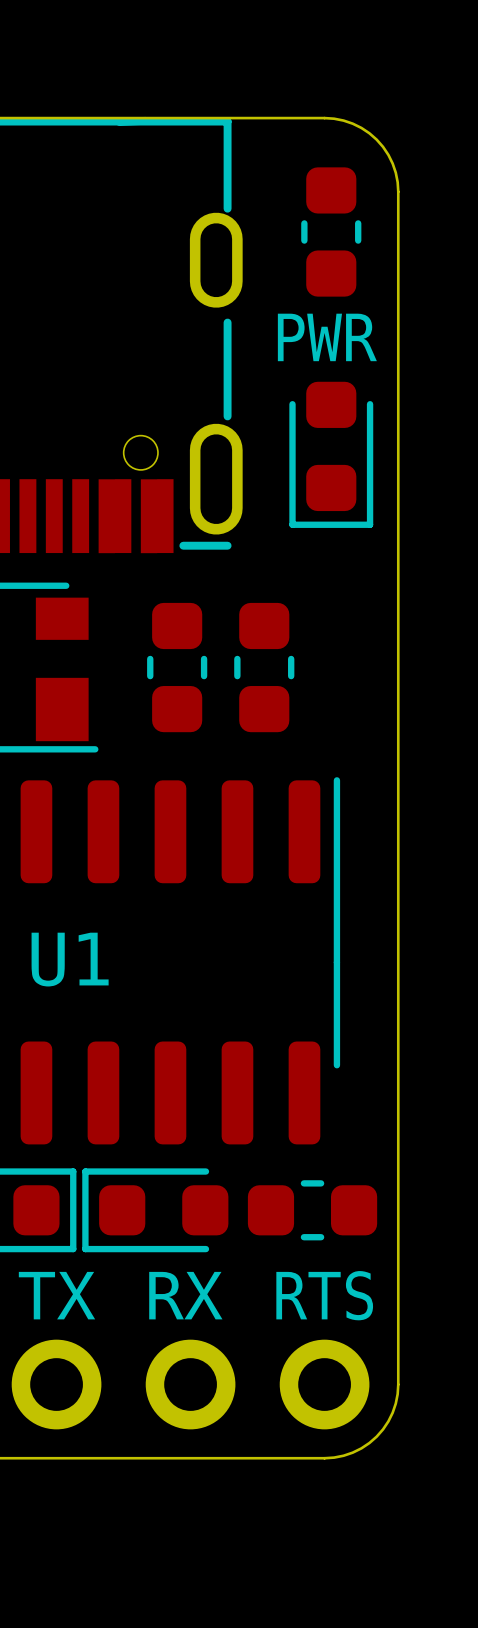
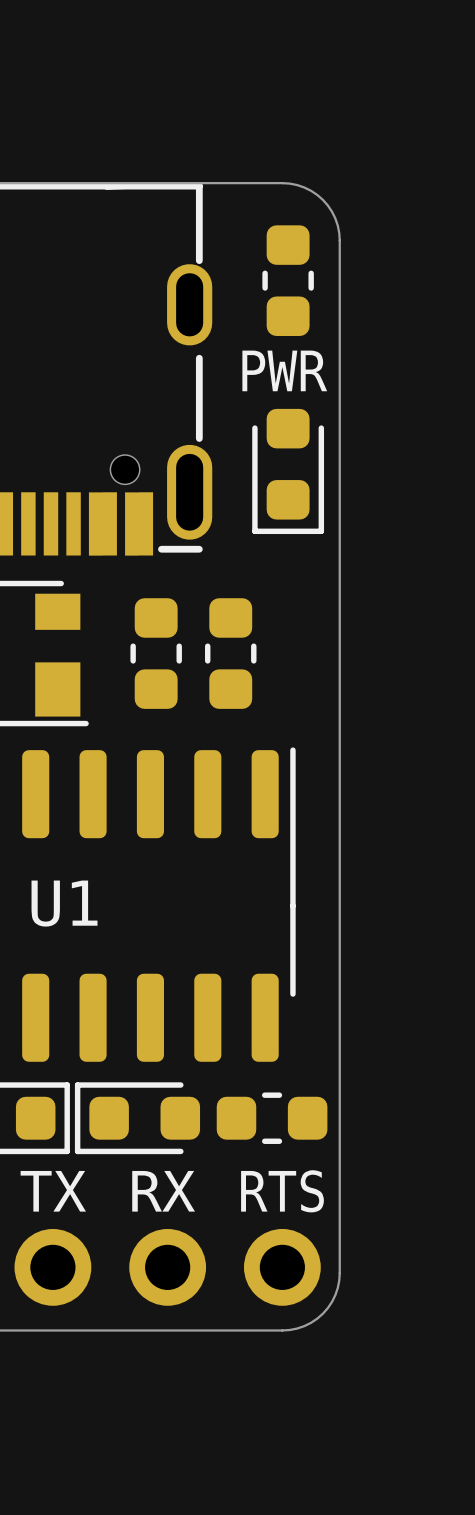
board edge: (324, 118) (352, 123) (376, 139) (392, 163) (398, 191) (398, 1384) -> (282, 183) (304, 187) (322, 199) (335, 218) (339, 240) (339, 1273) (335, 1295) (322, 1313) (304, 1326) (282, 1330)
board edge: (398, 1384) (392, 1412) (376, 1436) (352, 1452) (324, 1458) -> none

